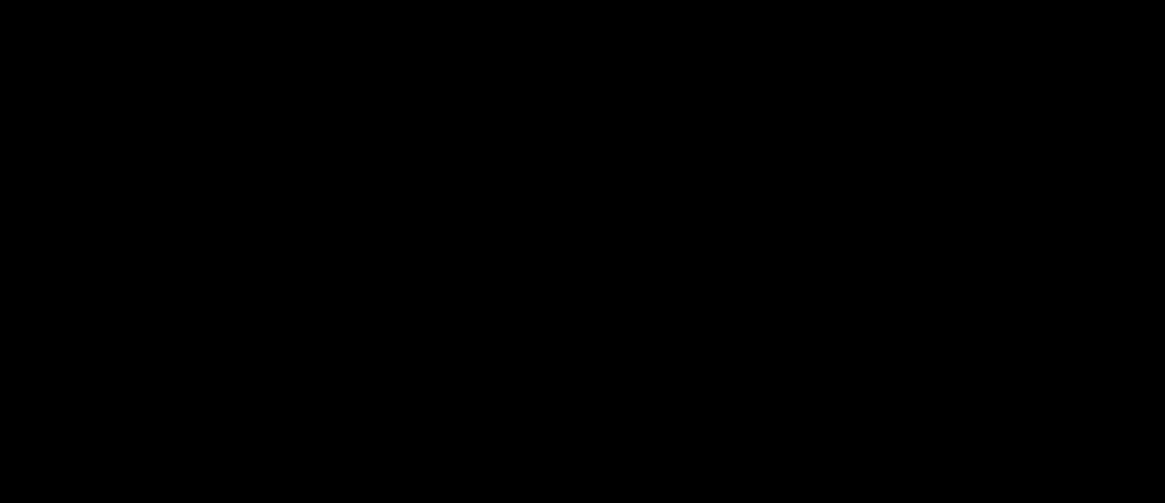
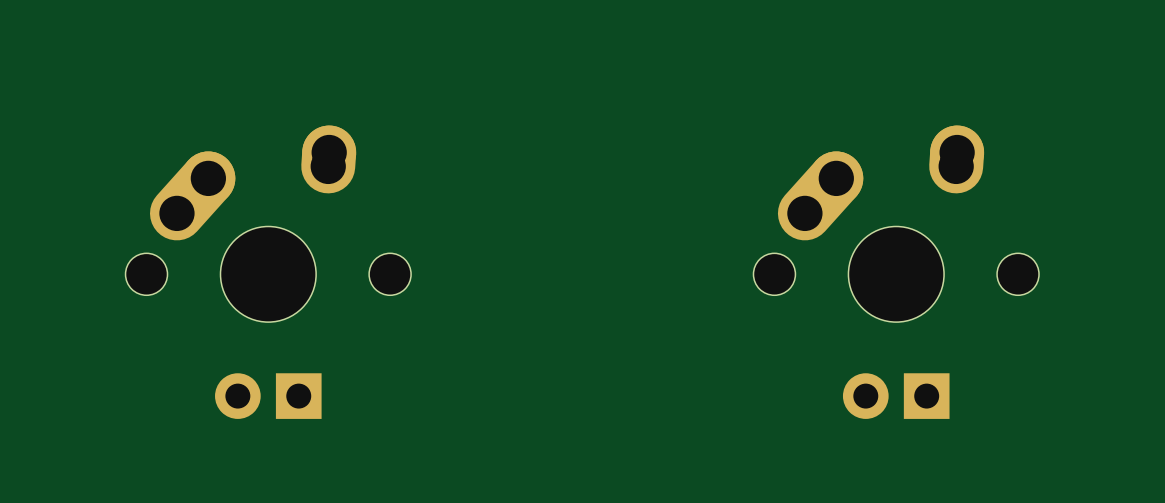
part: none -> (268, 272)
part: none -> (896, 272)

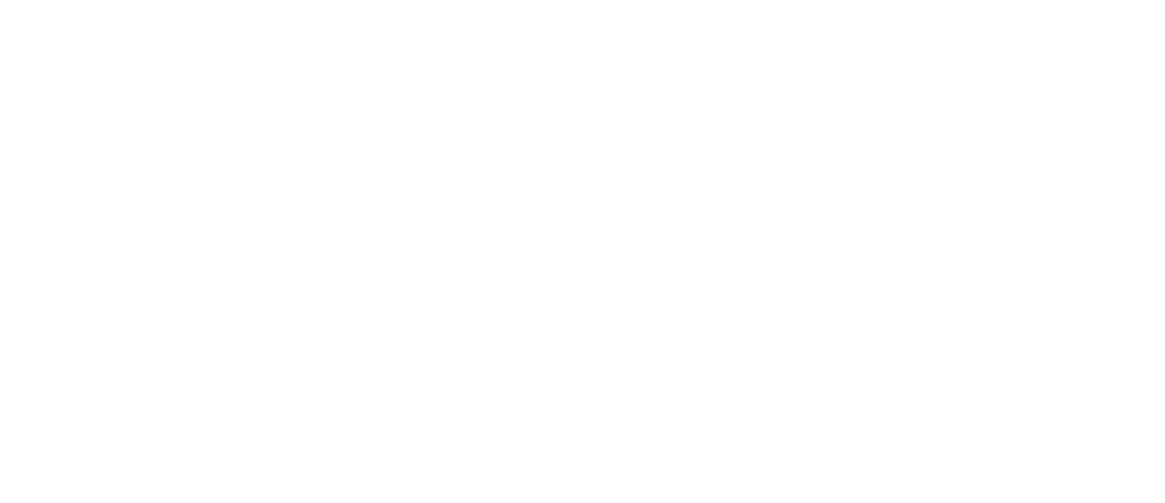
part: (268, 272) -> none
part: (896, 272) -> none

